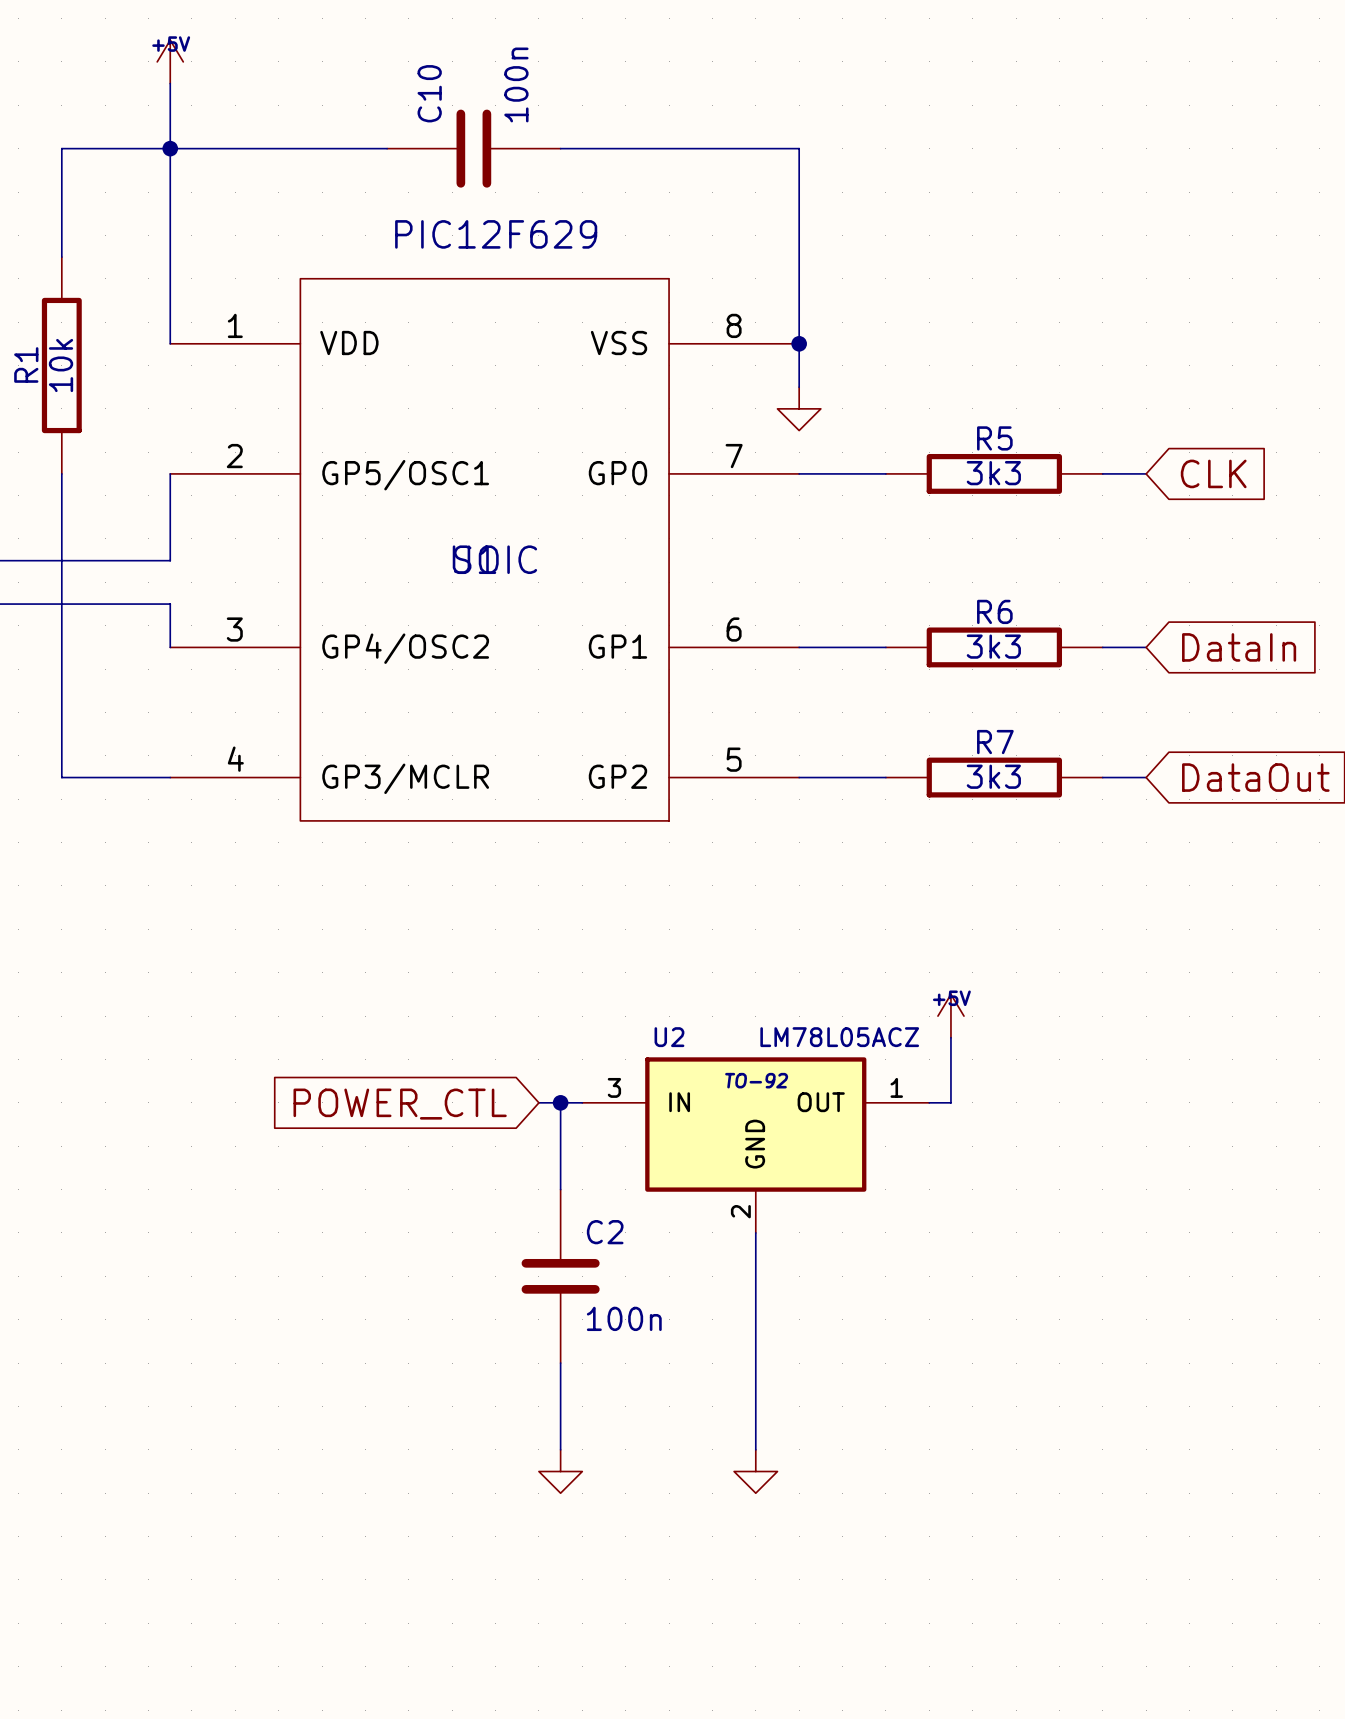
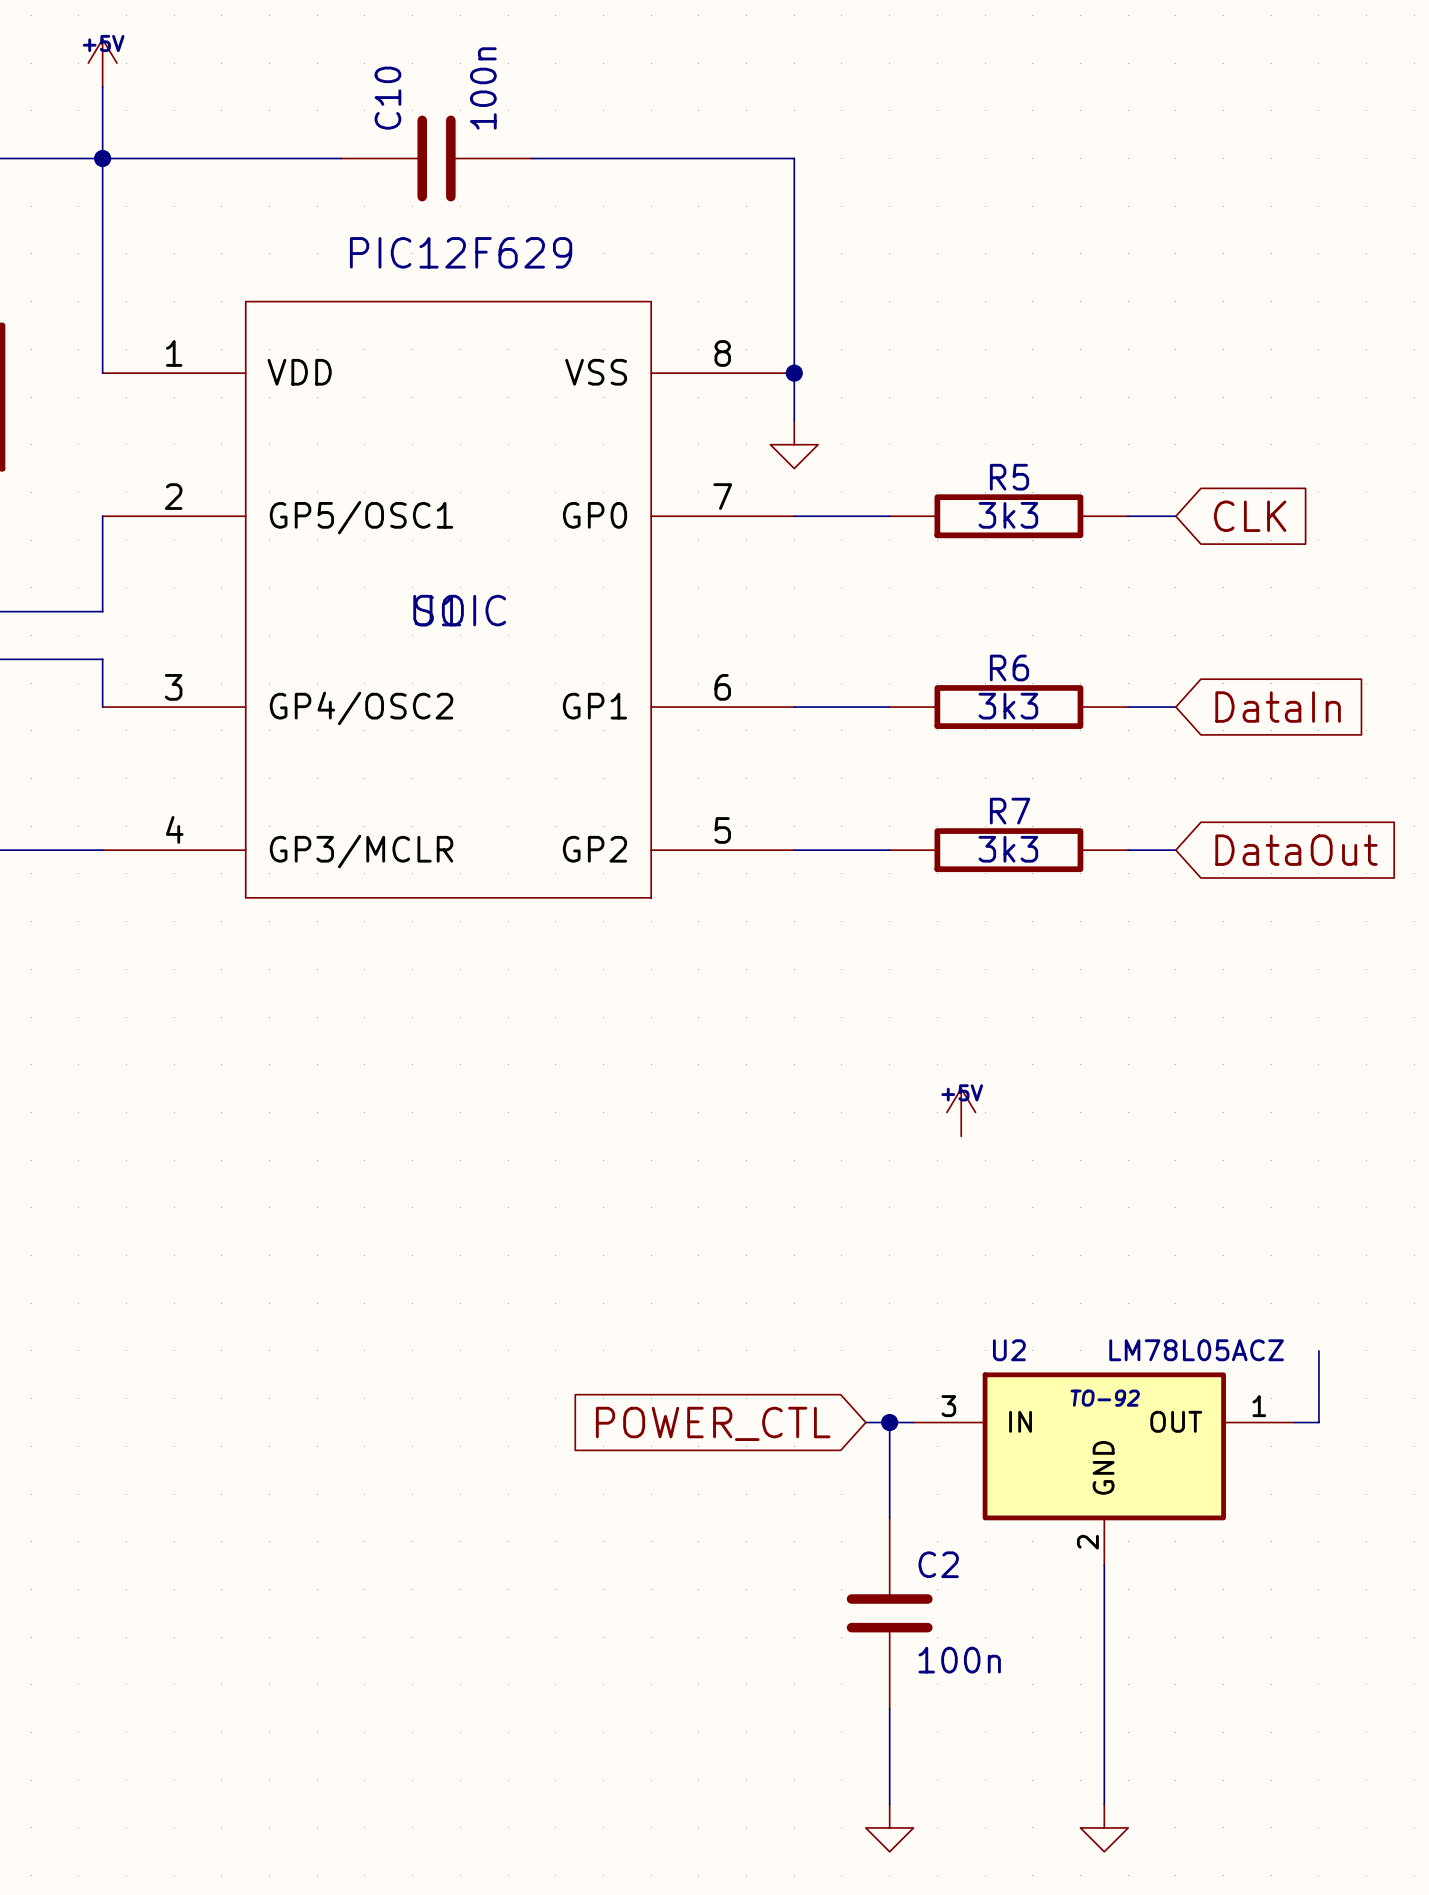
wire: (950, 1037) (950, 1102) (929, 1102) -> (1318, 1350) (1318, 1422) (1295, 1422)
wire: (538, 1102) (582, 1102) -> (865, 1422) (913, 1422)
wire: (560, 1102) (560, 1189) -> (889, 1422) (889, 1517)
junction: (560, 1102) -> none
global label position: POWER_CTL (400, 1104) -> POWER_CTL (713, 1423)
U2 position: (755, 1145) -> (1104, 1469)
wire: (755, 1232) (755, 1449) -> (1104, 1565) (1104, 1804)
C2 position: (560, 1276) -> (889, 1613)
junction: none -> (889, 1422)
wire: (560, 1363) (560, 1449) -> (889, 1708) (889, 1804)
power symbol: (560, 1471) -> none
power symbol: (755, 1471) -> none
power symbol: none -> (889, 1827)
power symbol: none -> (1104, 1827)

